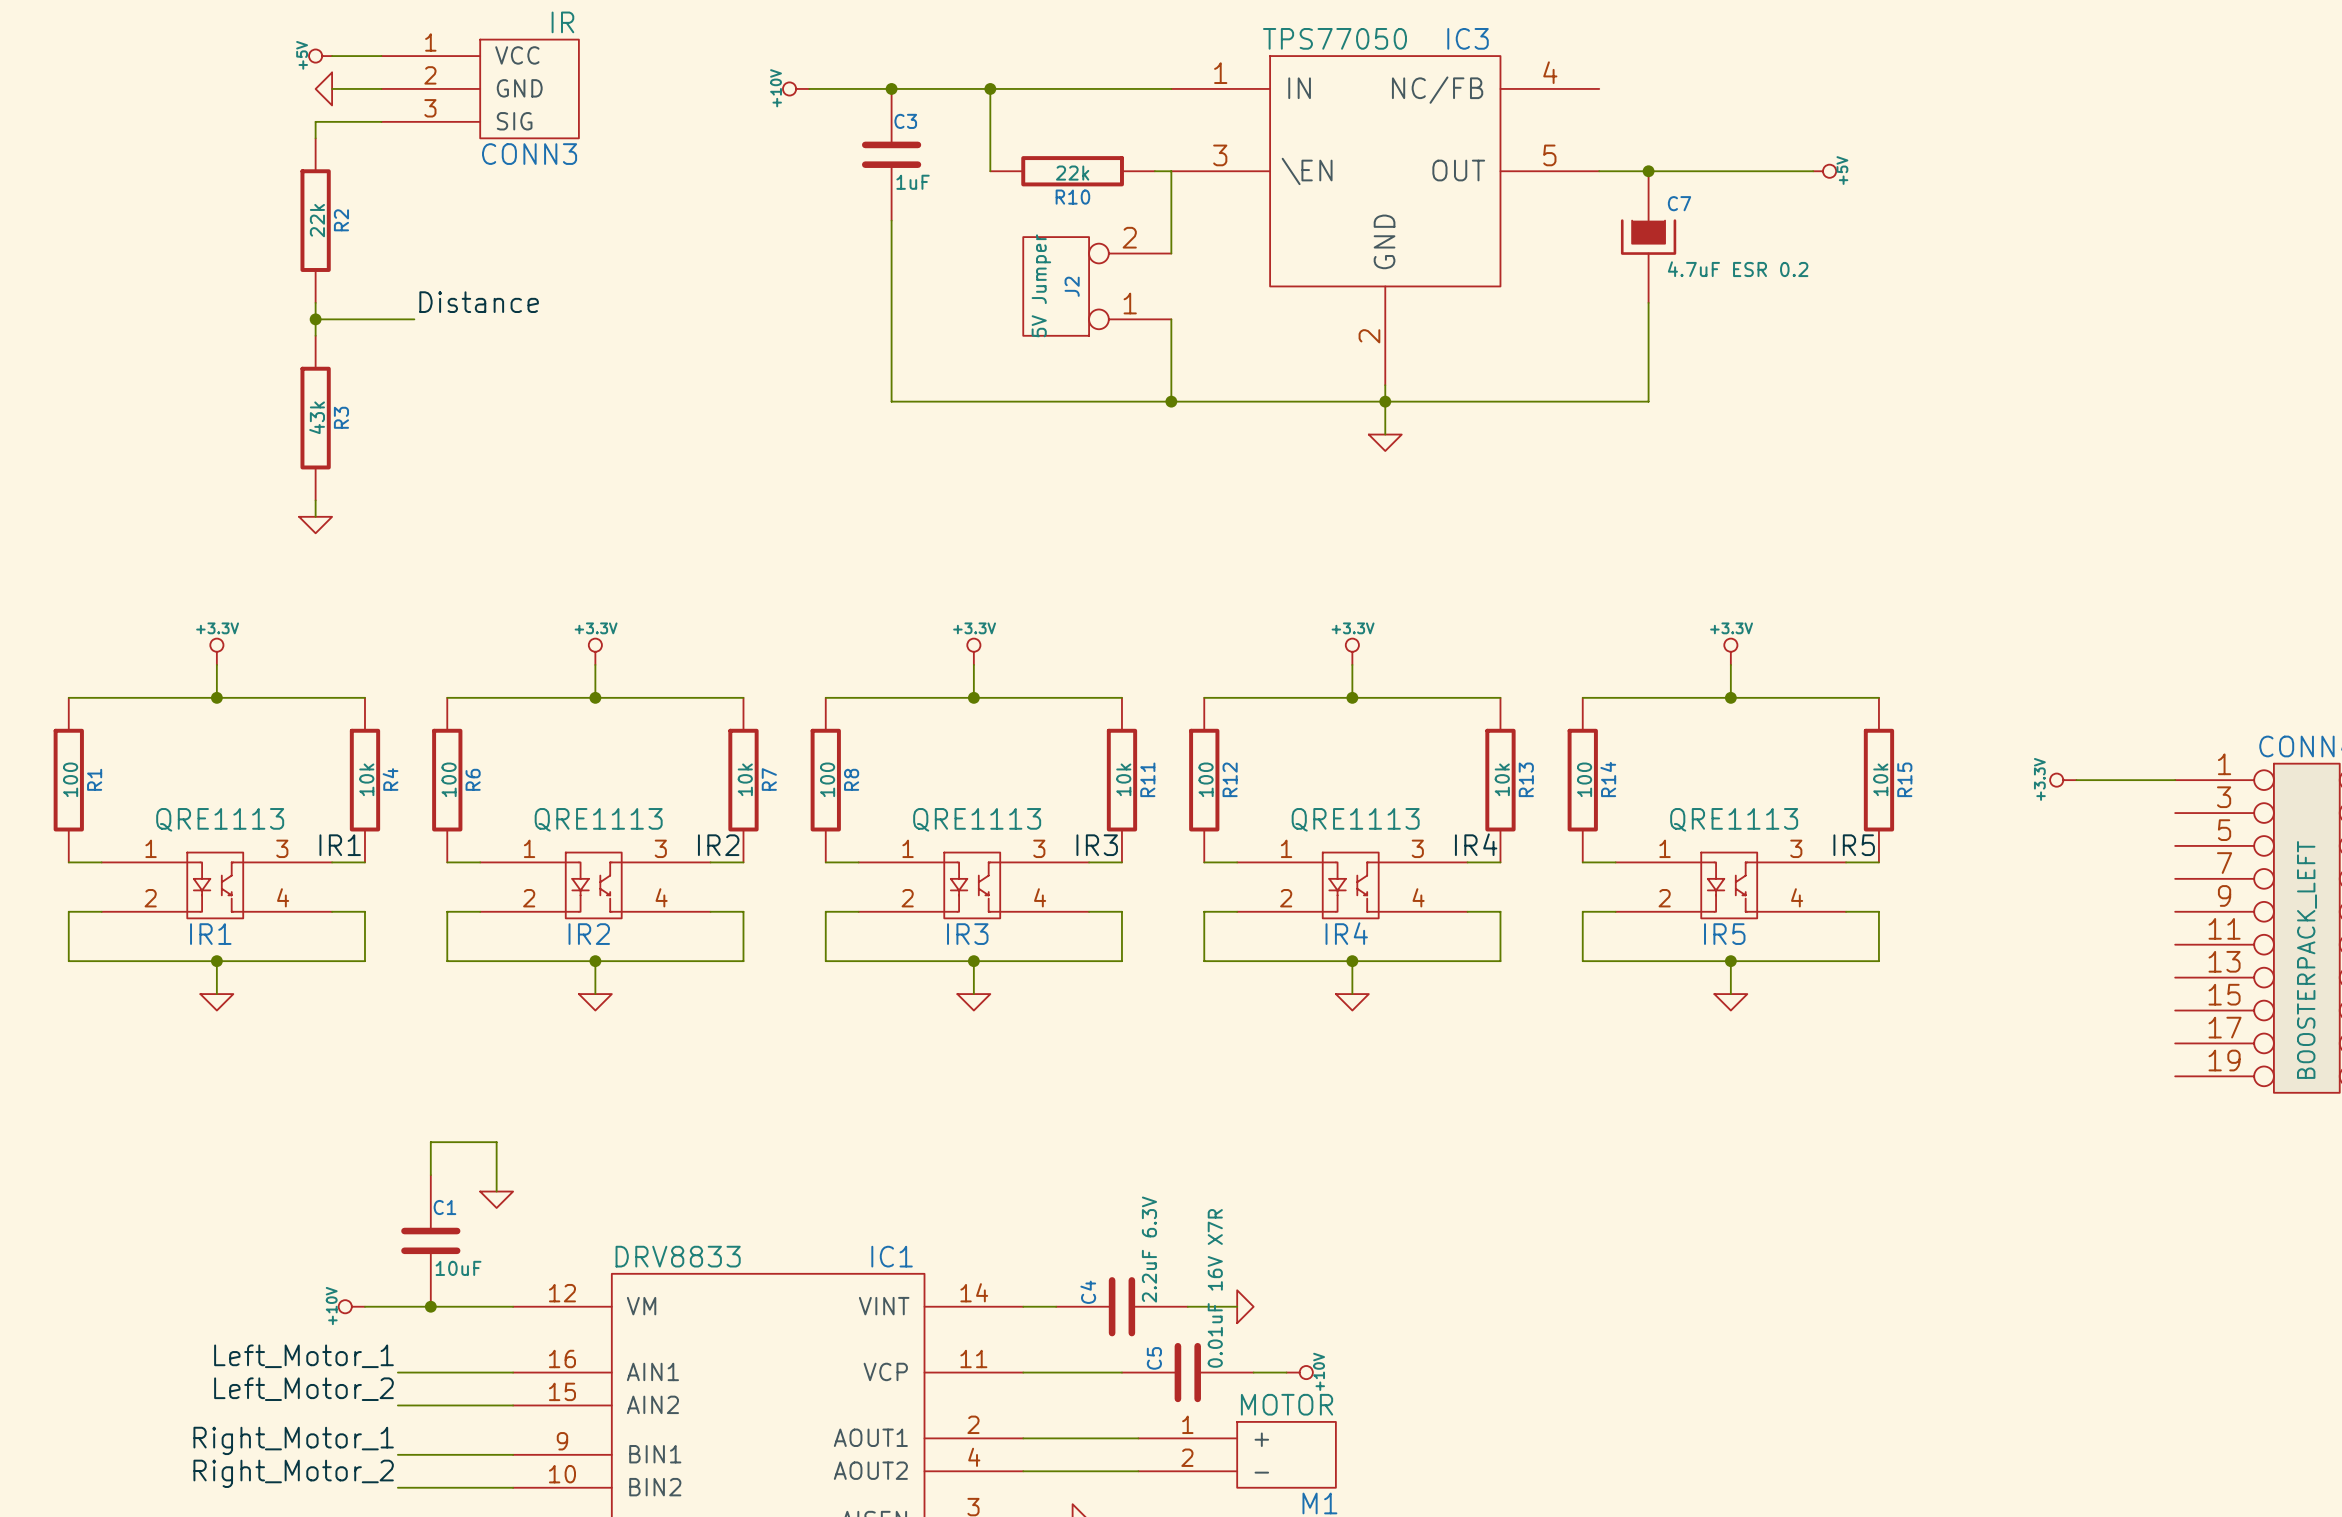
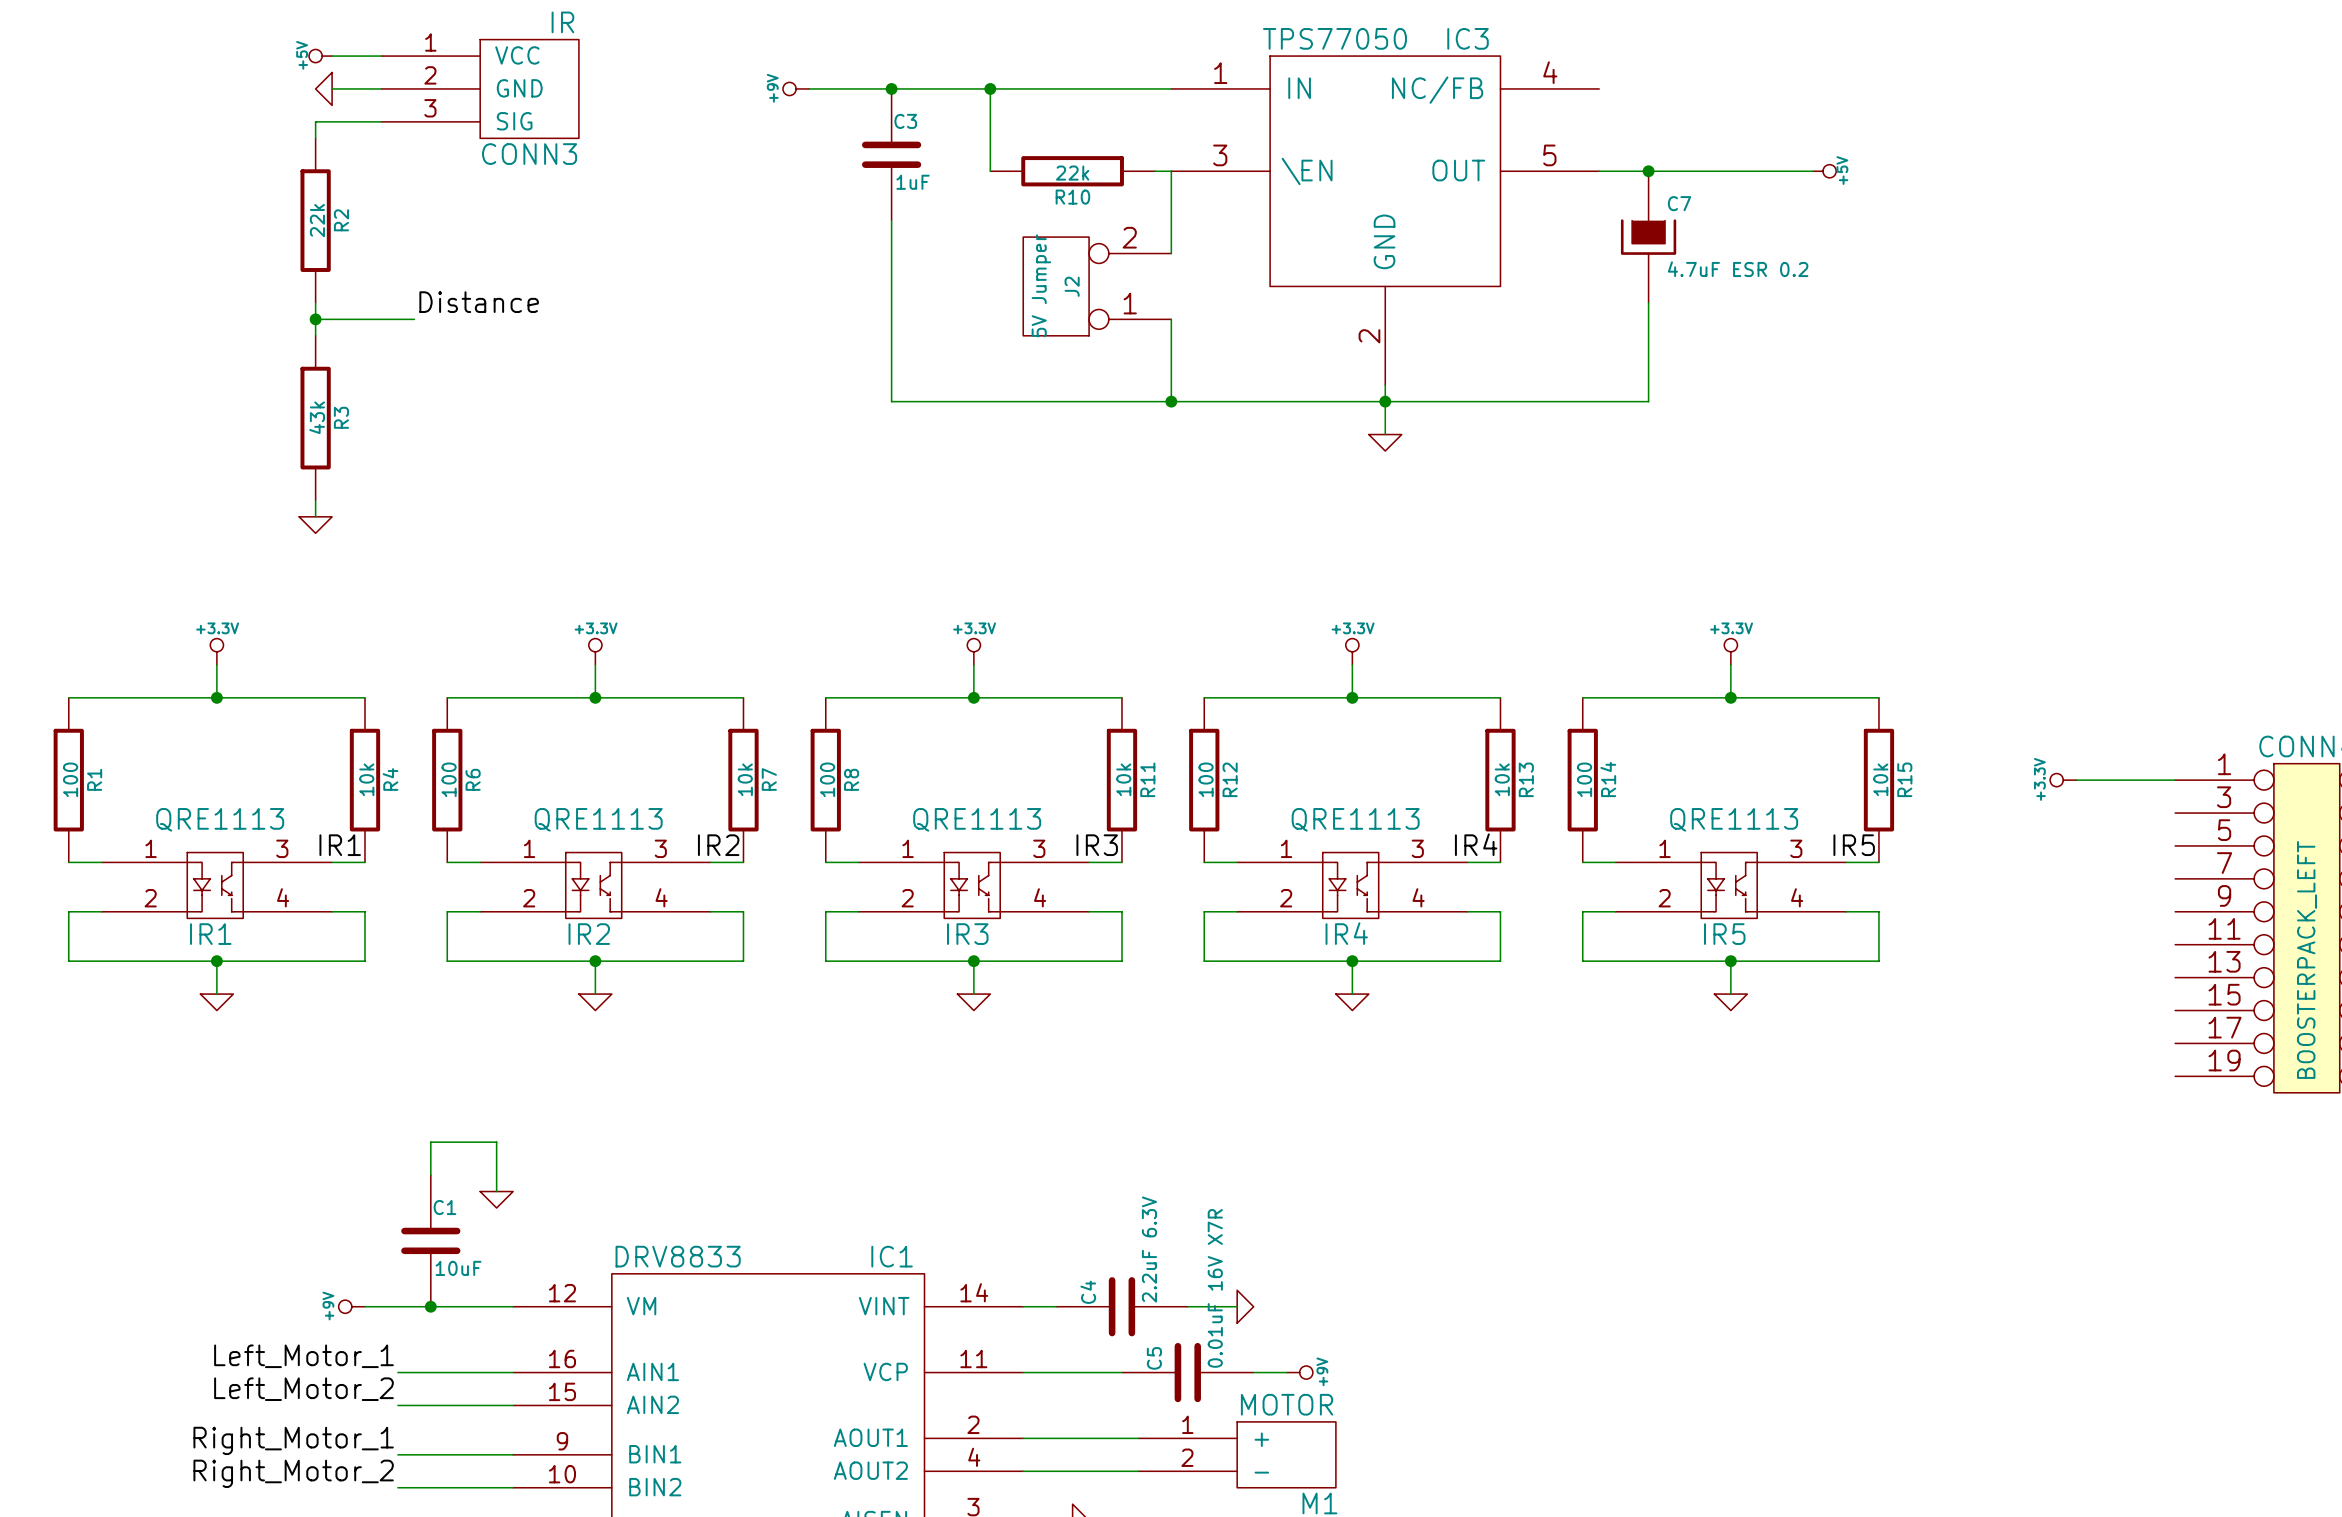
power symbol: +10V (796, 88) -> +9V (796, 88)
power symbol: +10V (351, 1306) -> +9V (351, 1306)
power symbol: +10V (1299, 1372) -> +9V (1299, 1372)

